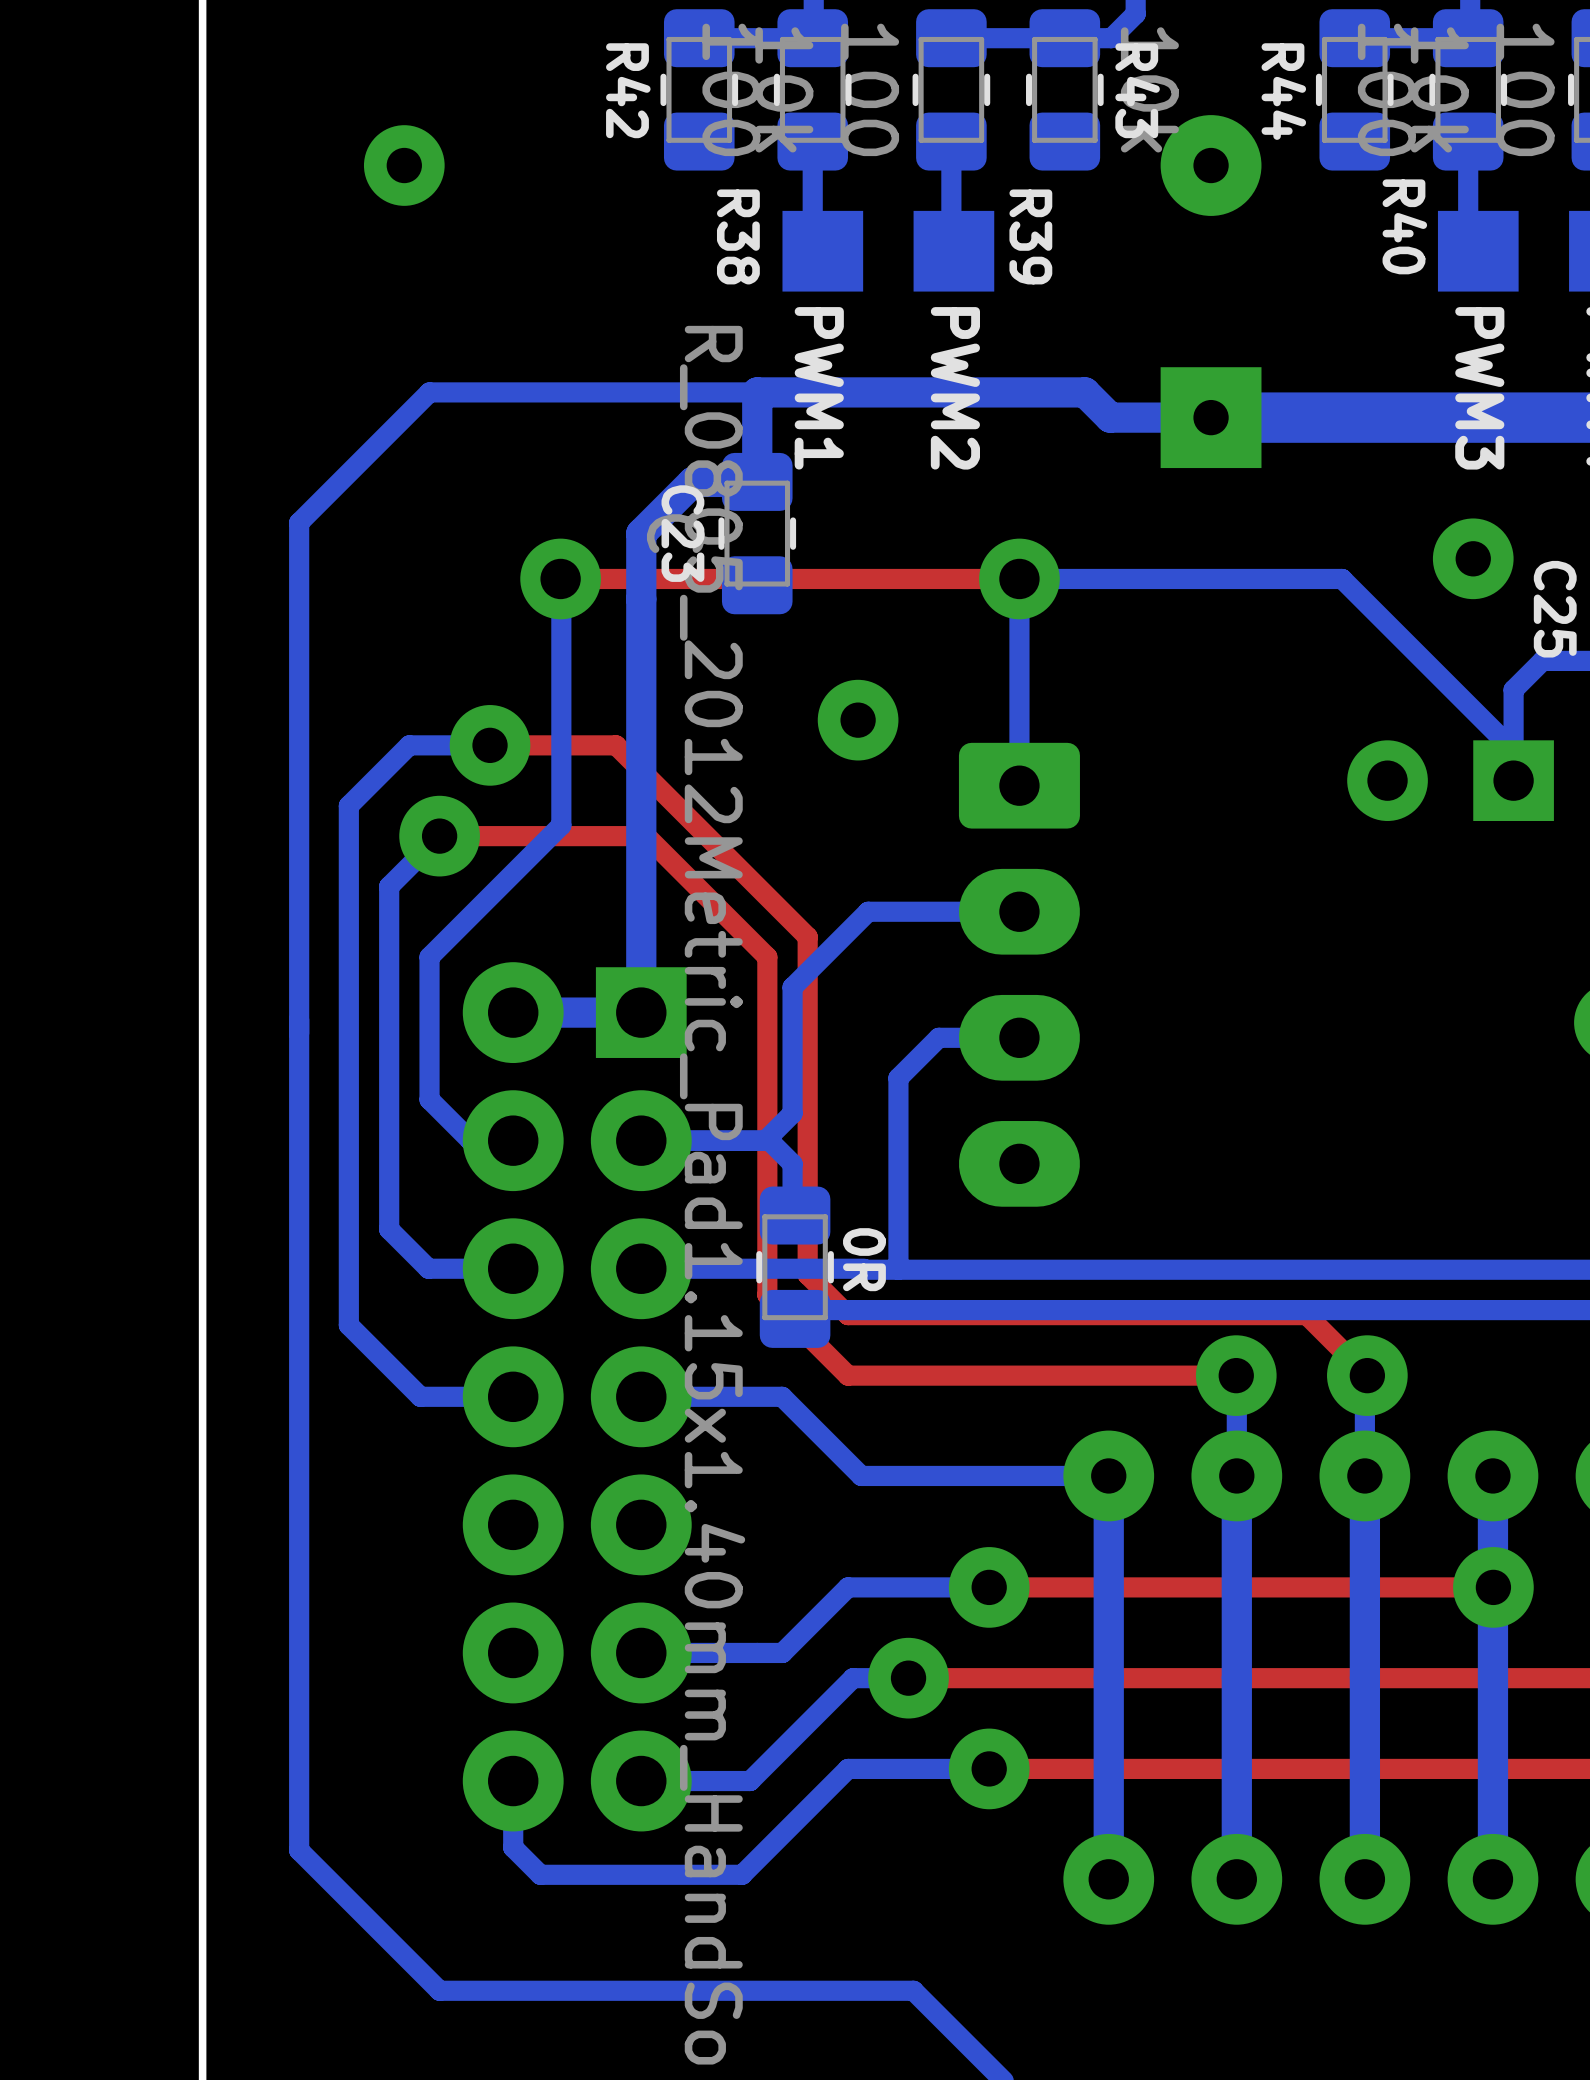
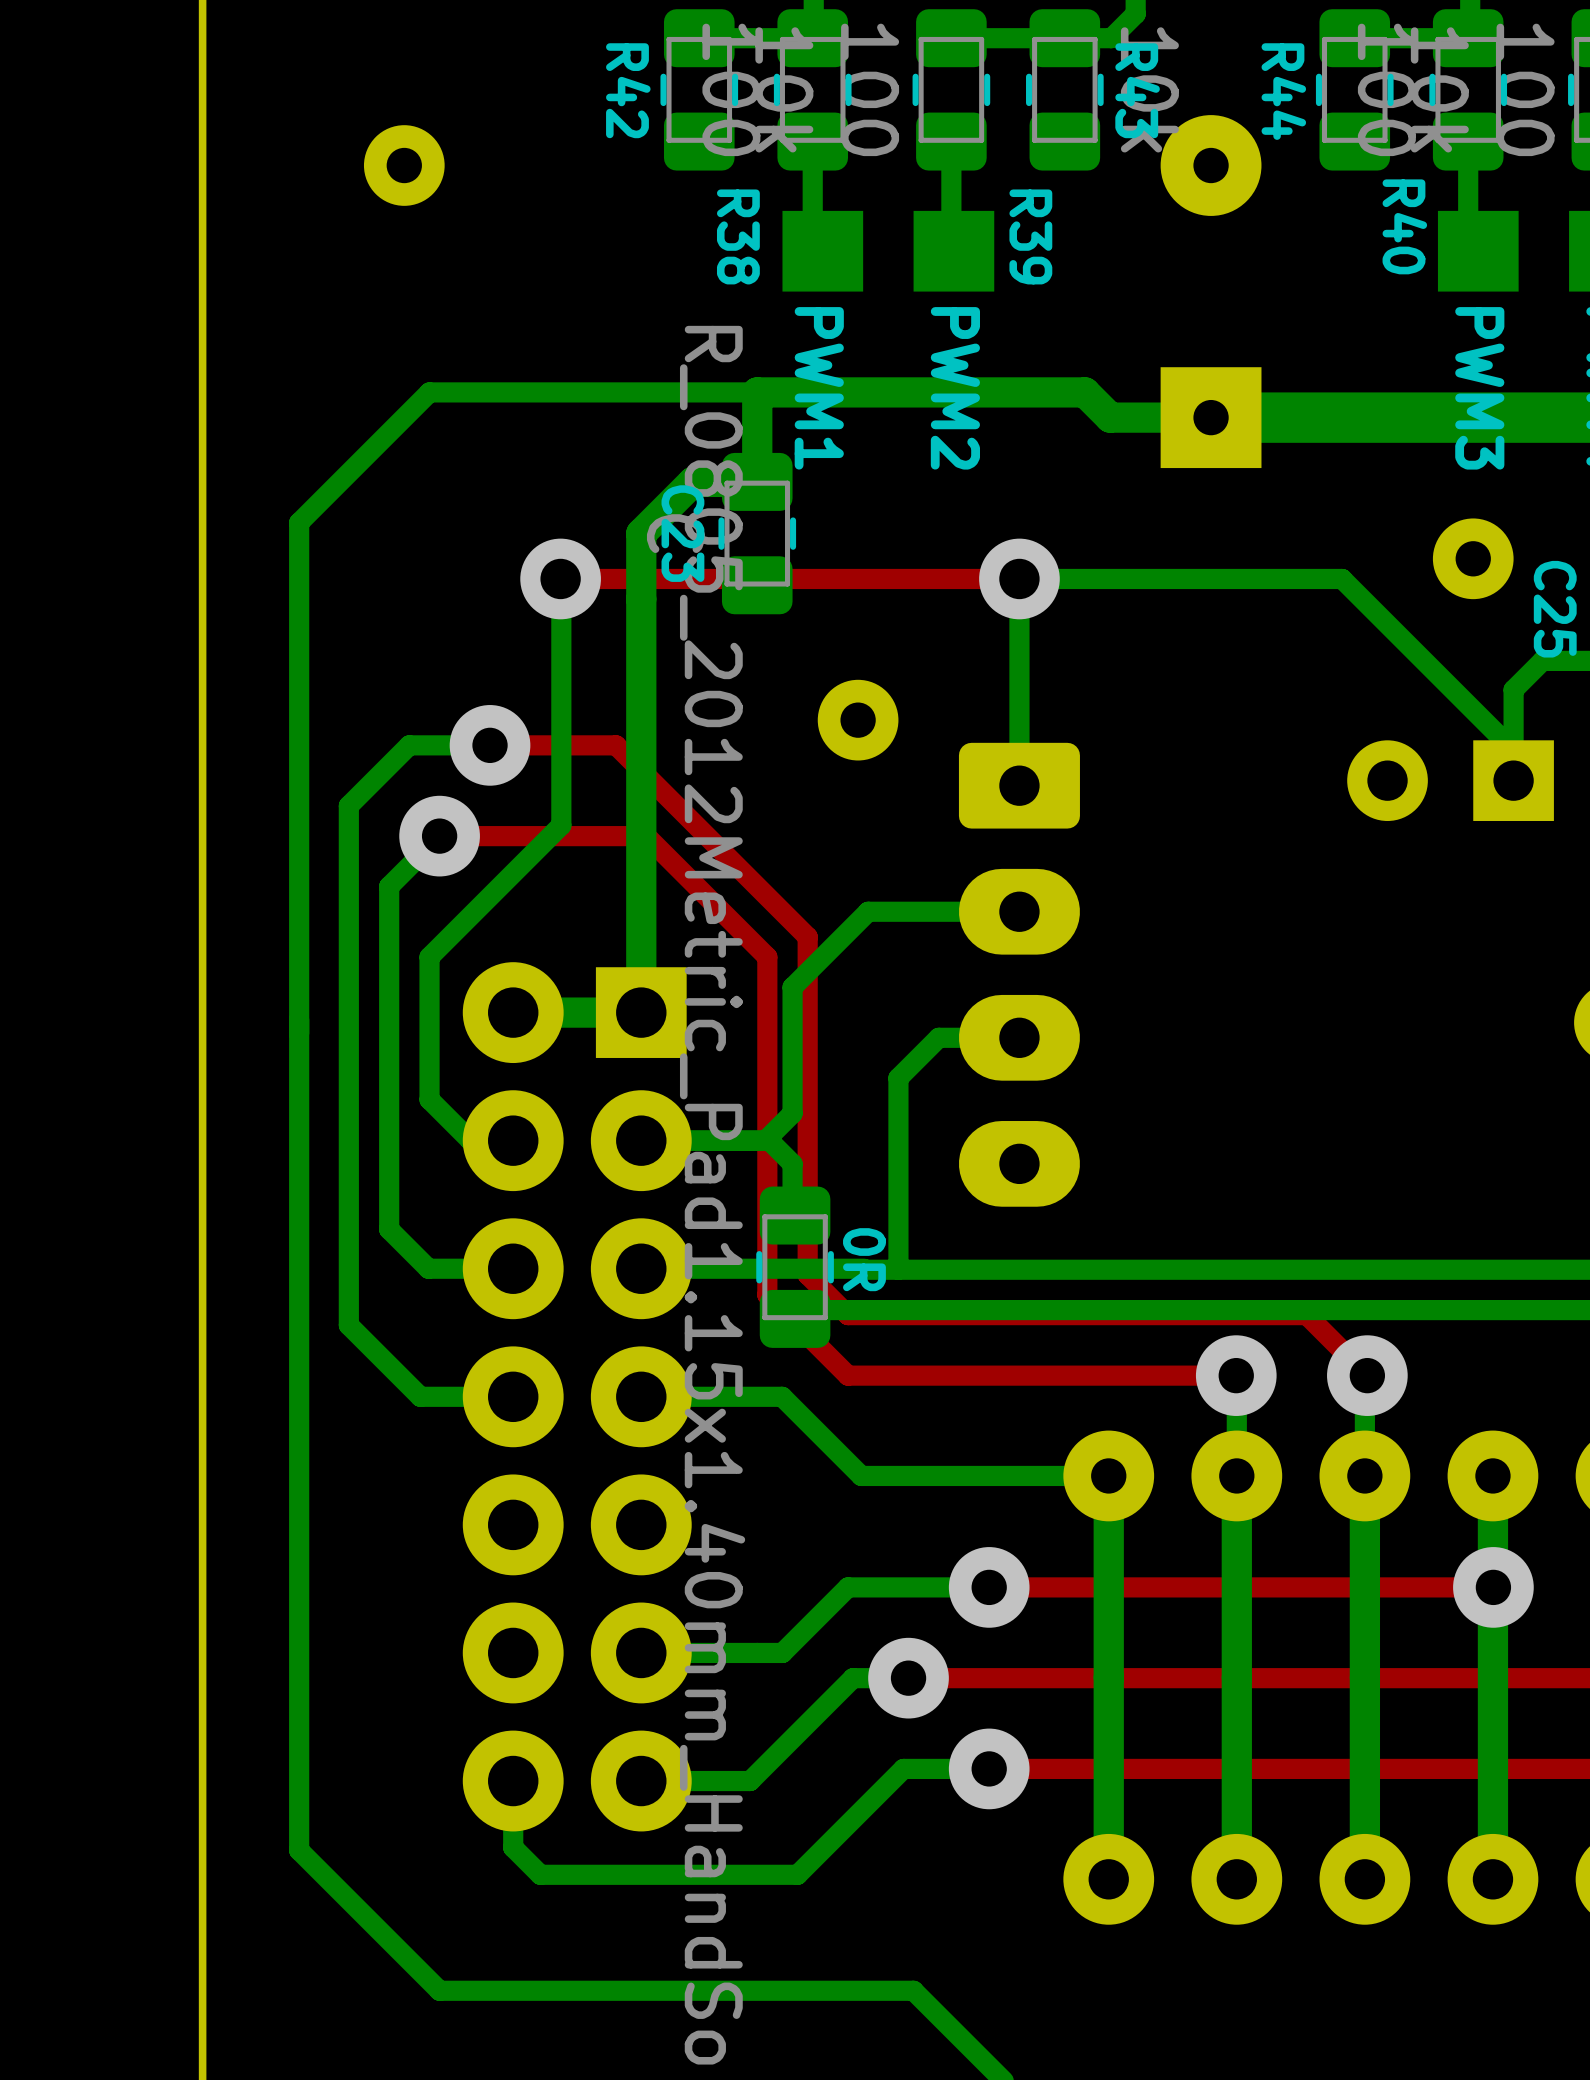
bottom track: (903, 1768) (848, 1768) (742, 1874) -> (903, 1768) (797, 1874) (742, 1874)

